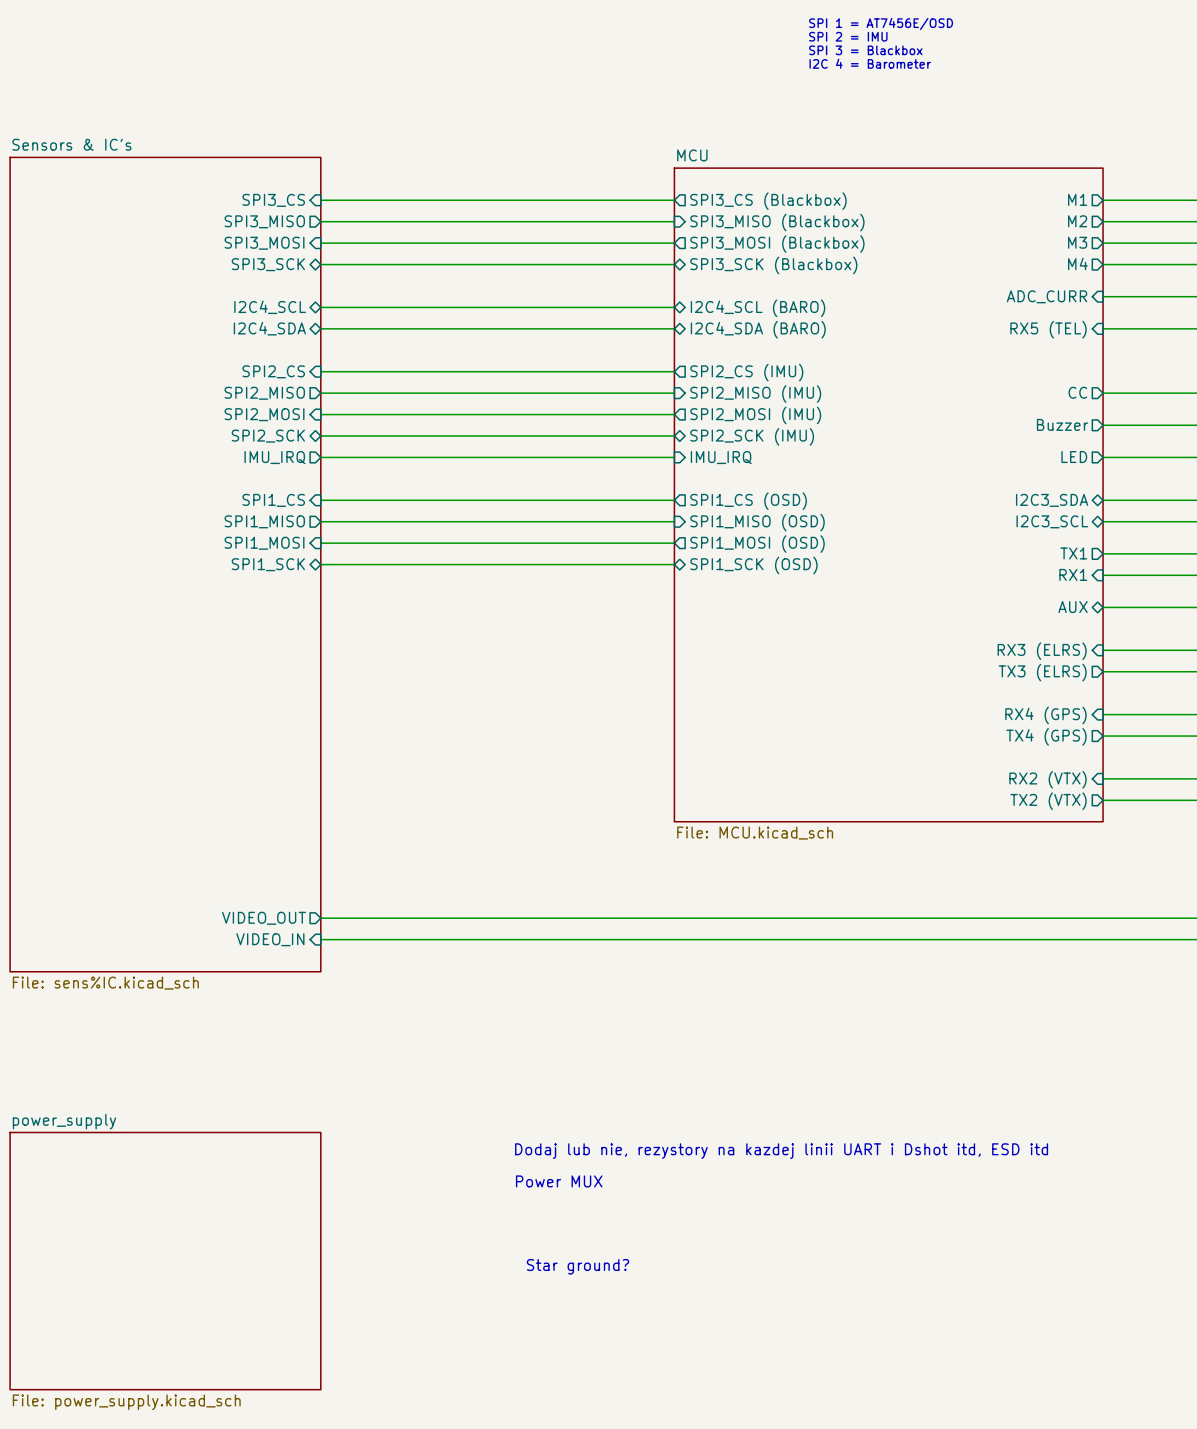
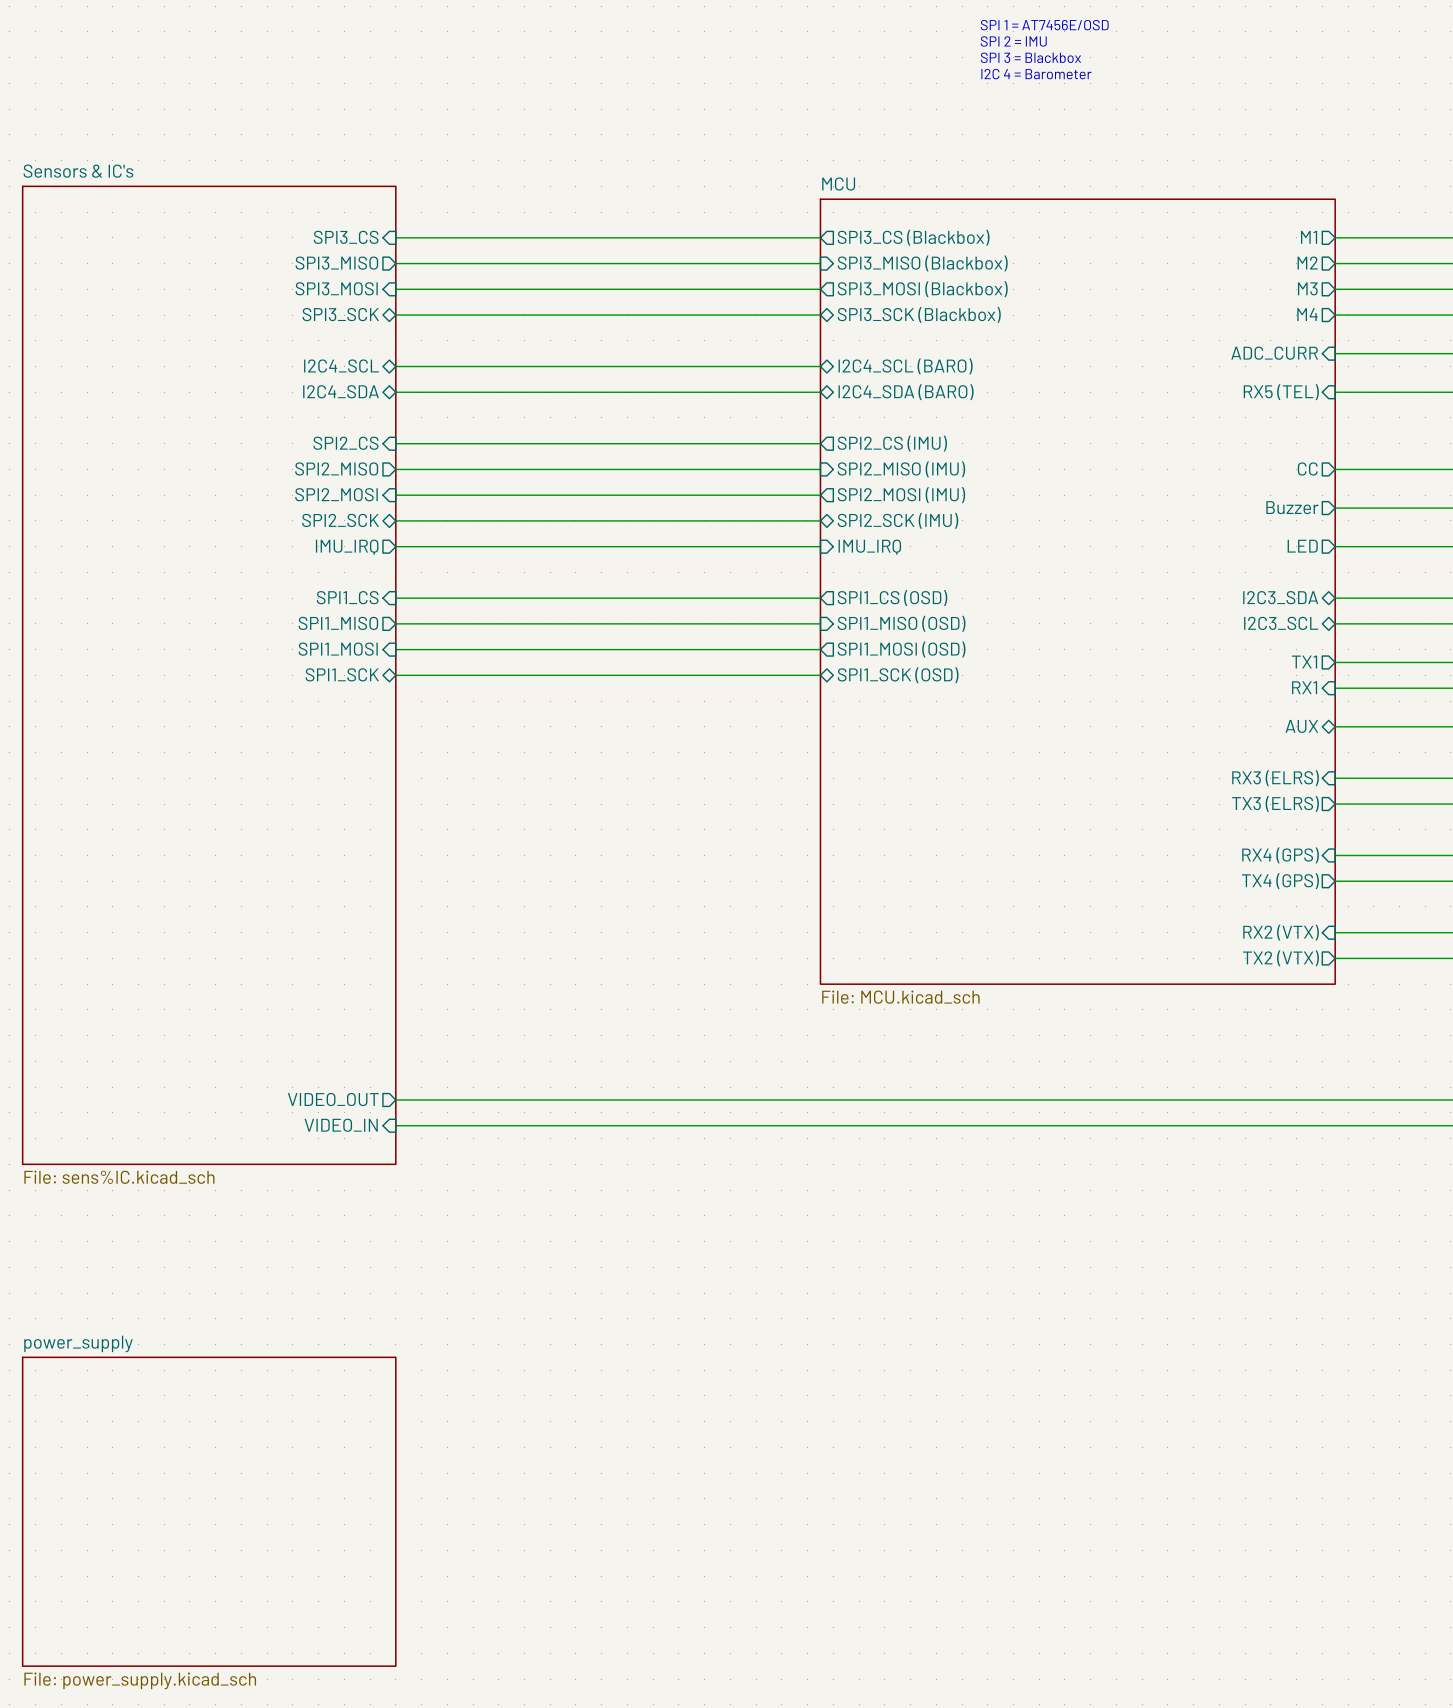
text: Dodaj lub nie, rezystory na kazdej linii UART i Dshot itd, ESD itd (781, 1151) -> none
text: Power MUX (559, 1181) -> none
text: Star ground? (577, 1266) -> none

